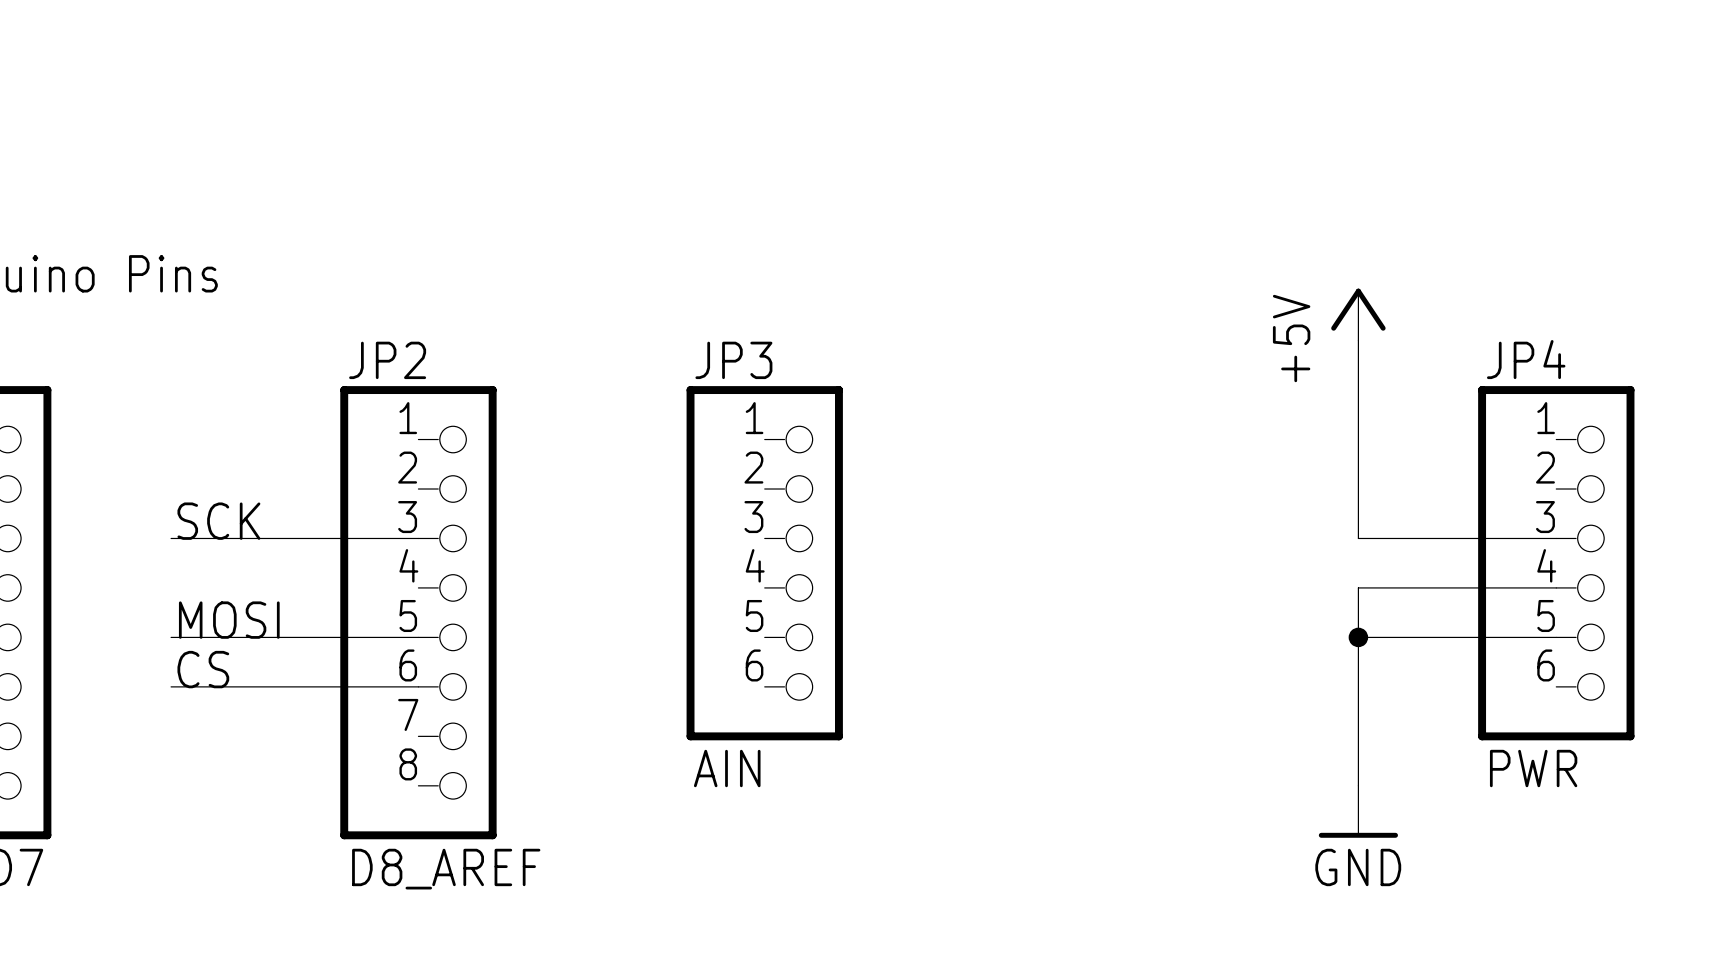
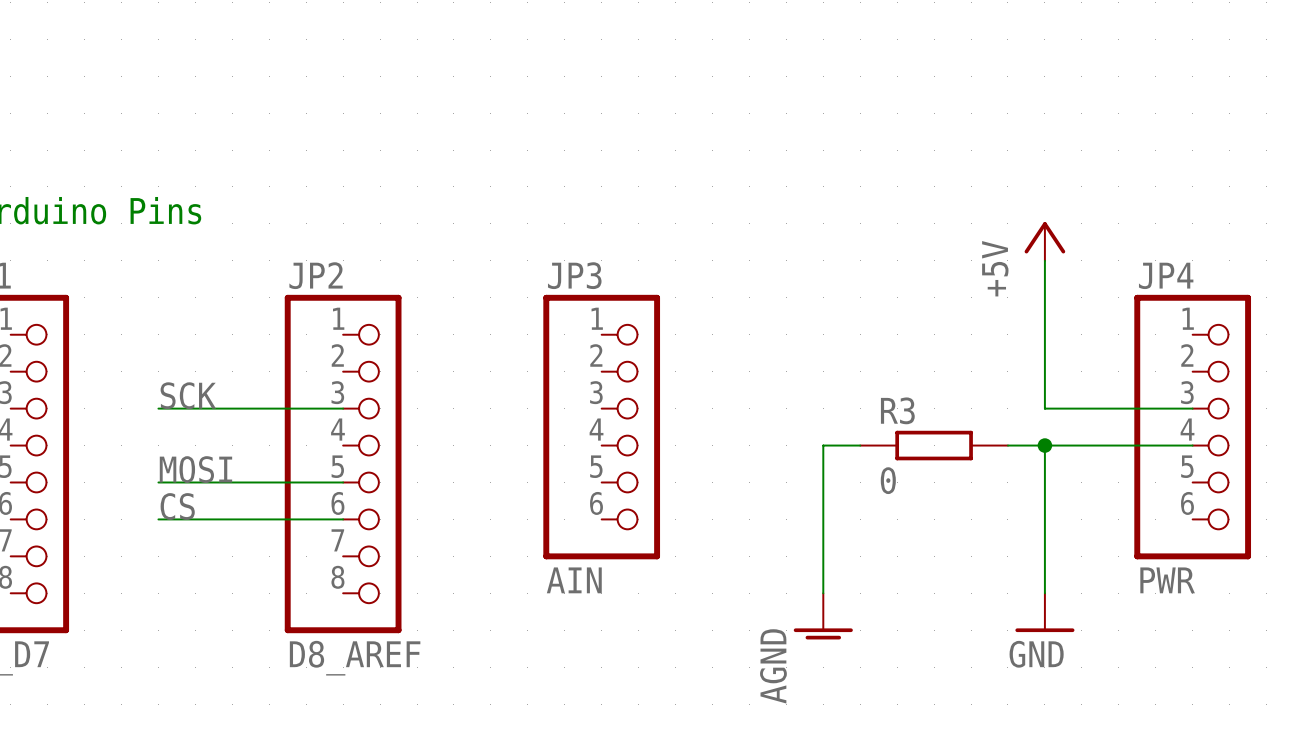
wire: none -> (860, 445) (823, 445) (823, 593)
R3: none -> 0 (934, 445)
wire: none -> (1007, 445) (1044, 445)
wire: (1358, 637) (1556, 637) -> none
junction position: (1358, 637) -> (1044, 445)
power symbol: none -> AGND (823, 616)

